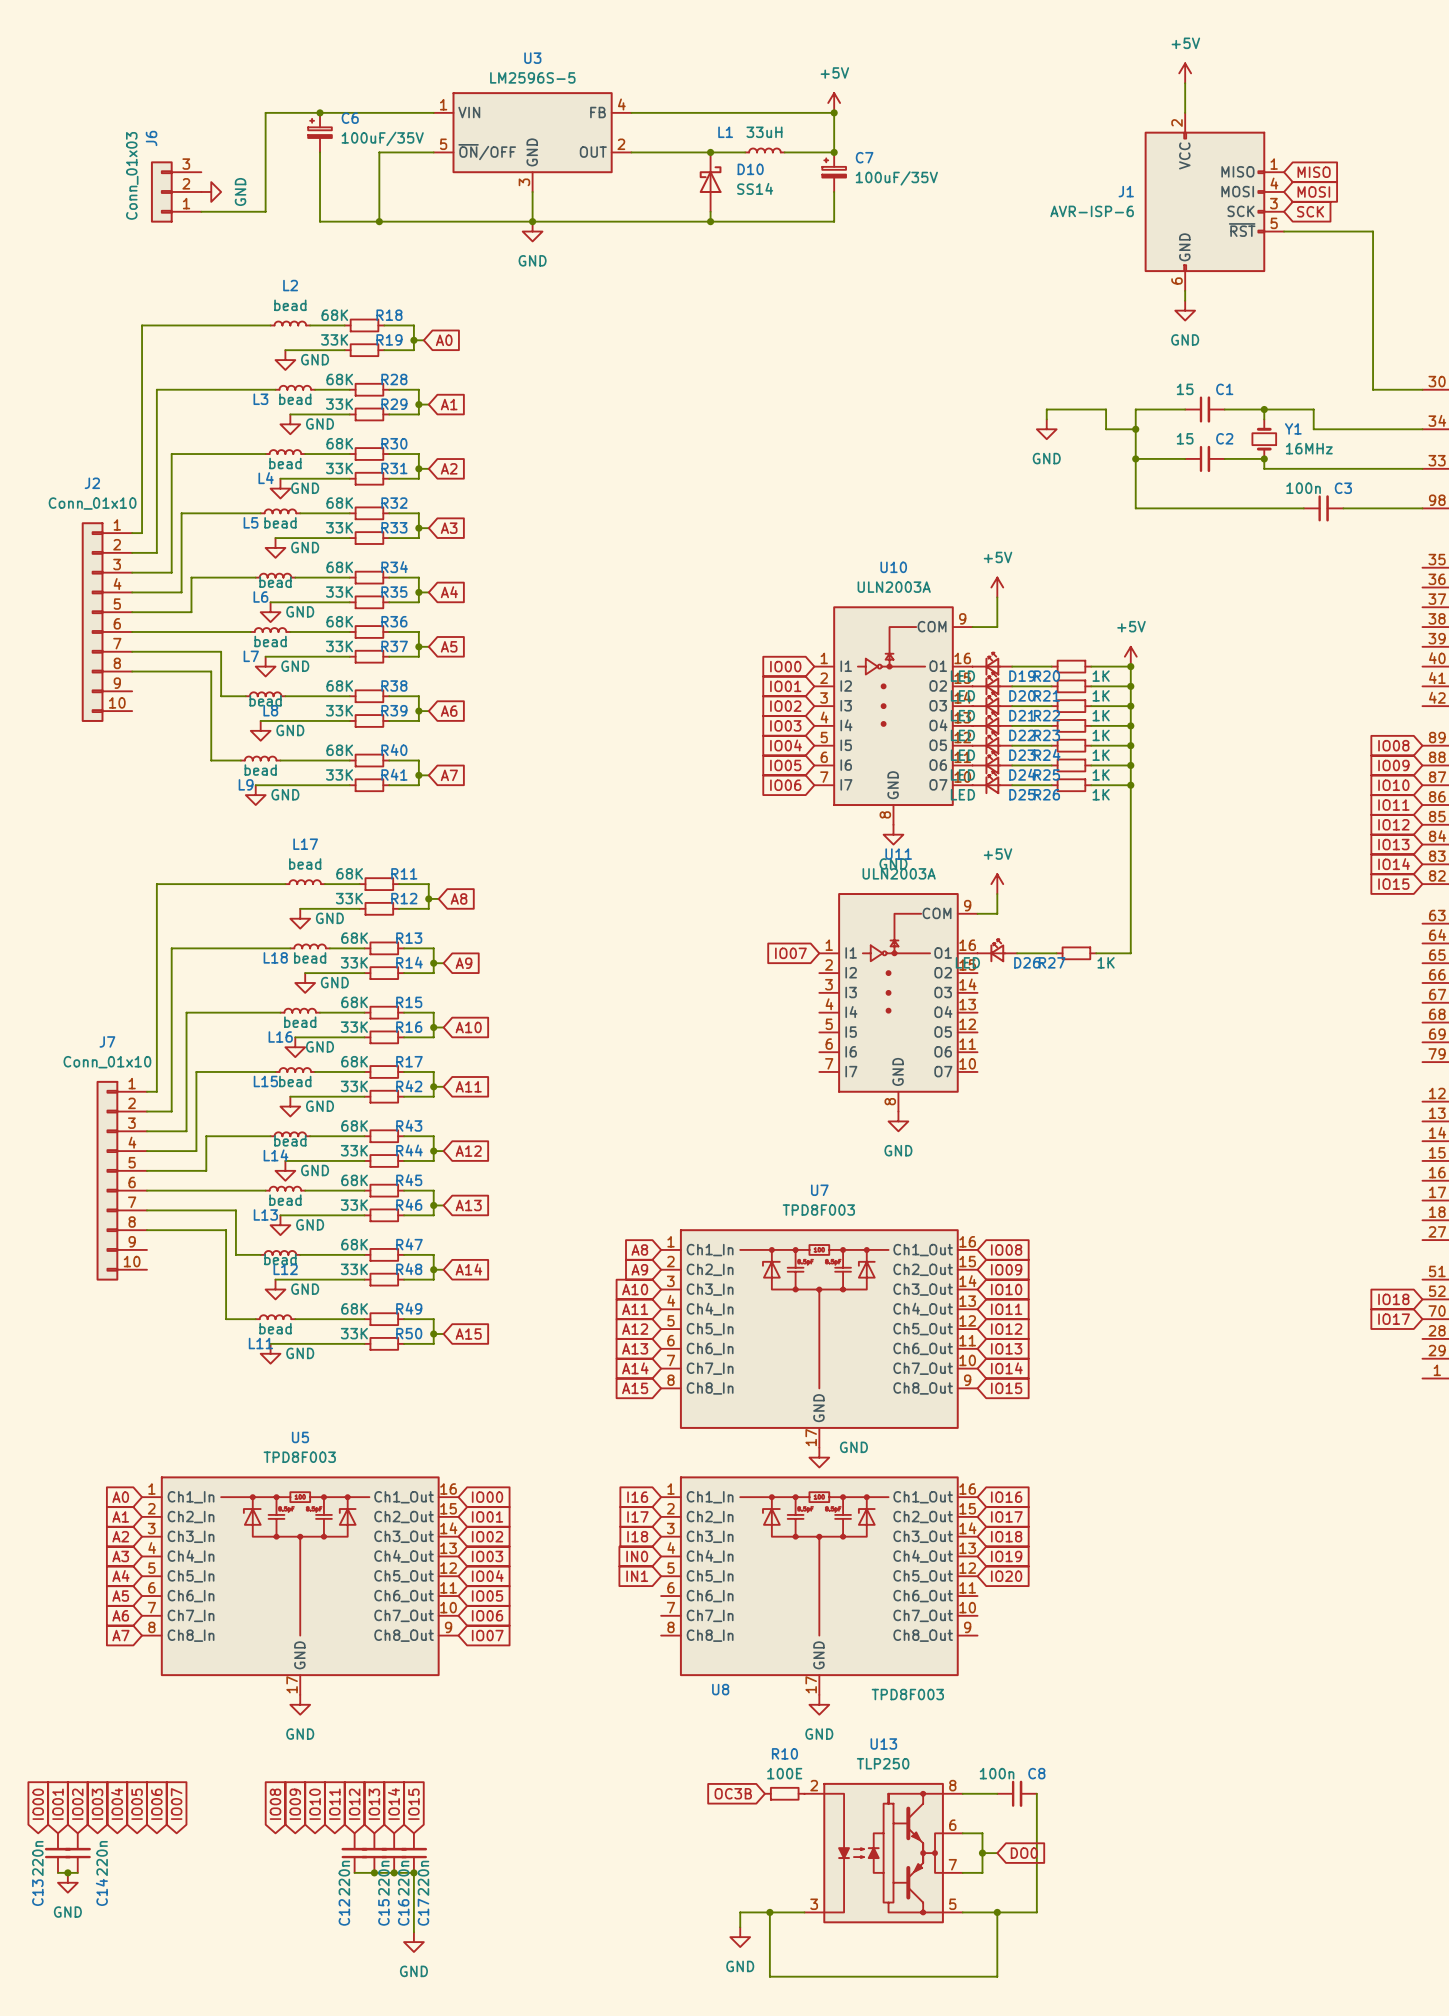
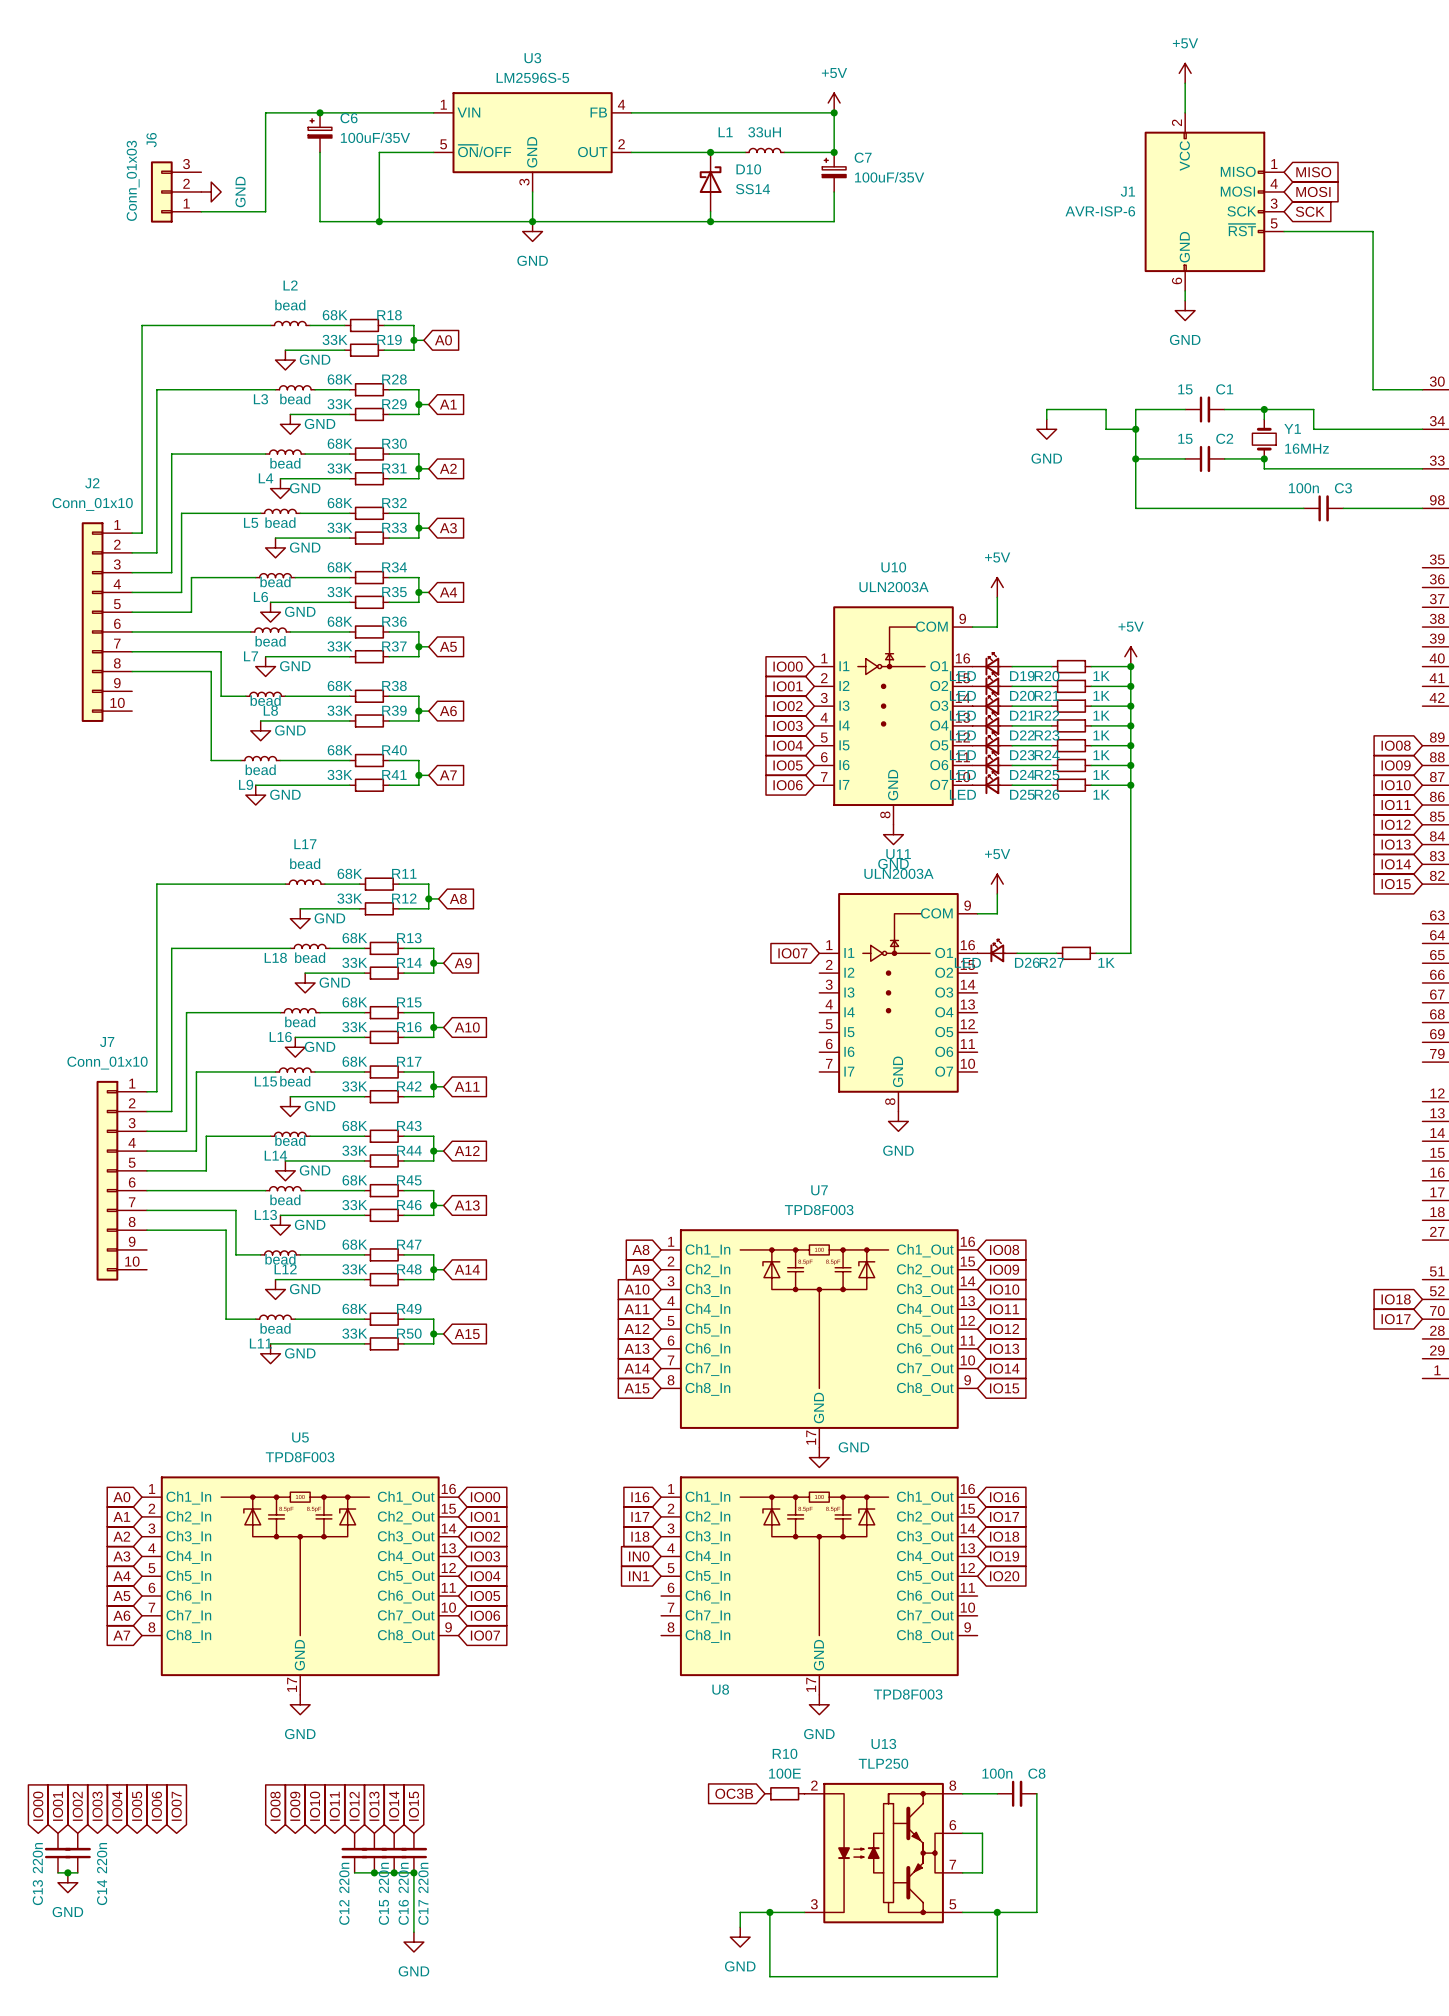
wire: (982, 1853) (997, 1853) -> none
junction: (982, 1853) -> none
global label: DO0 (1024, 1853) -> none

